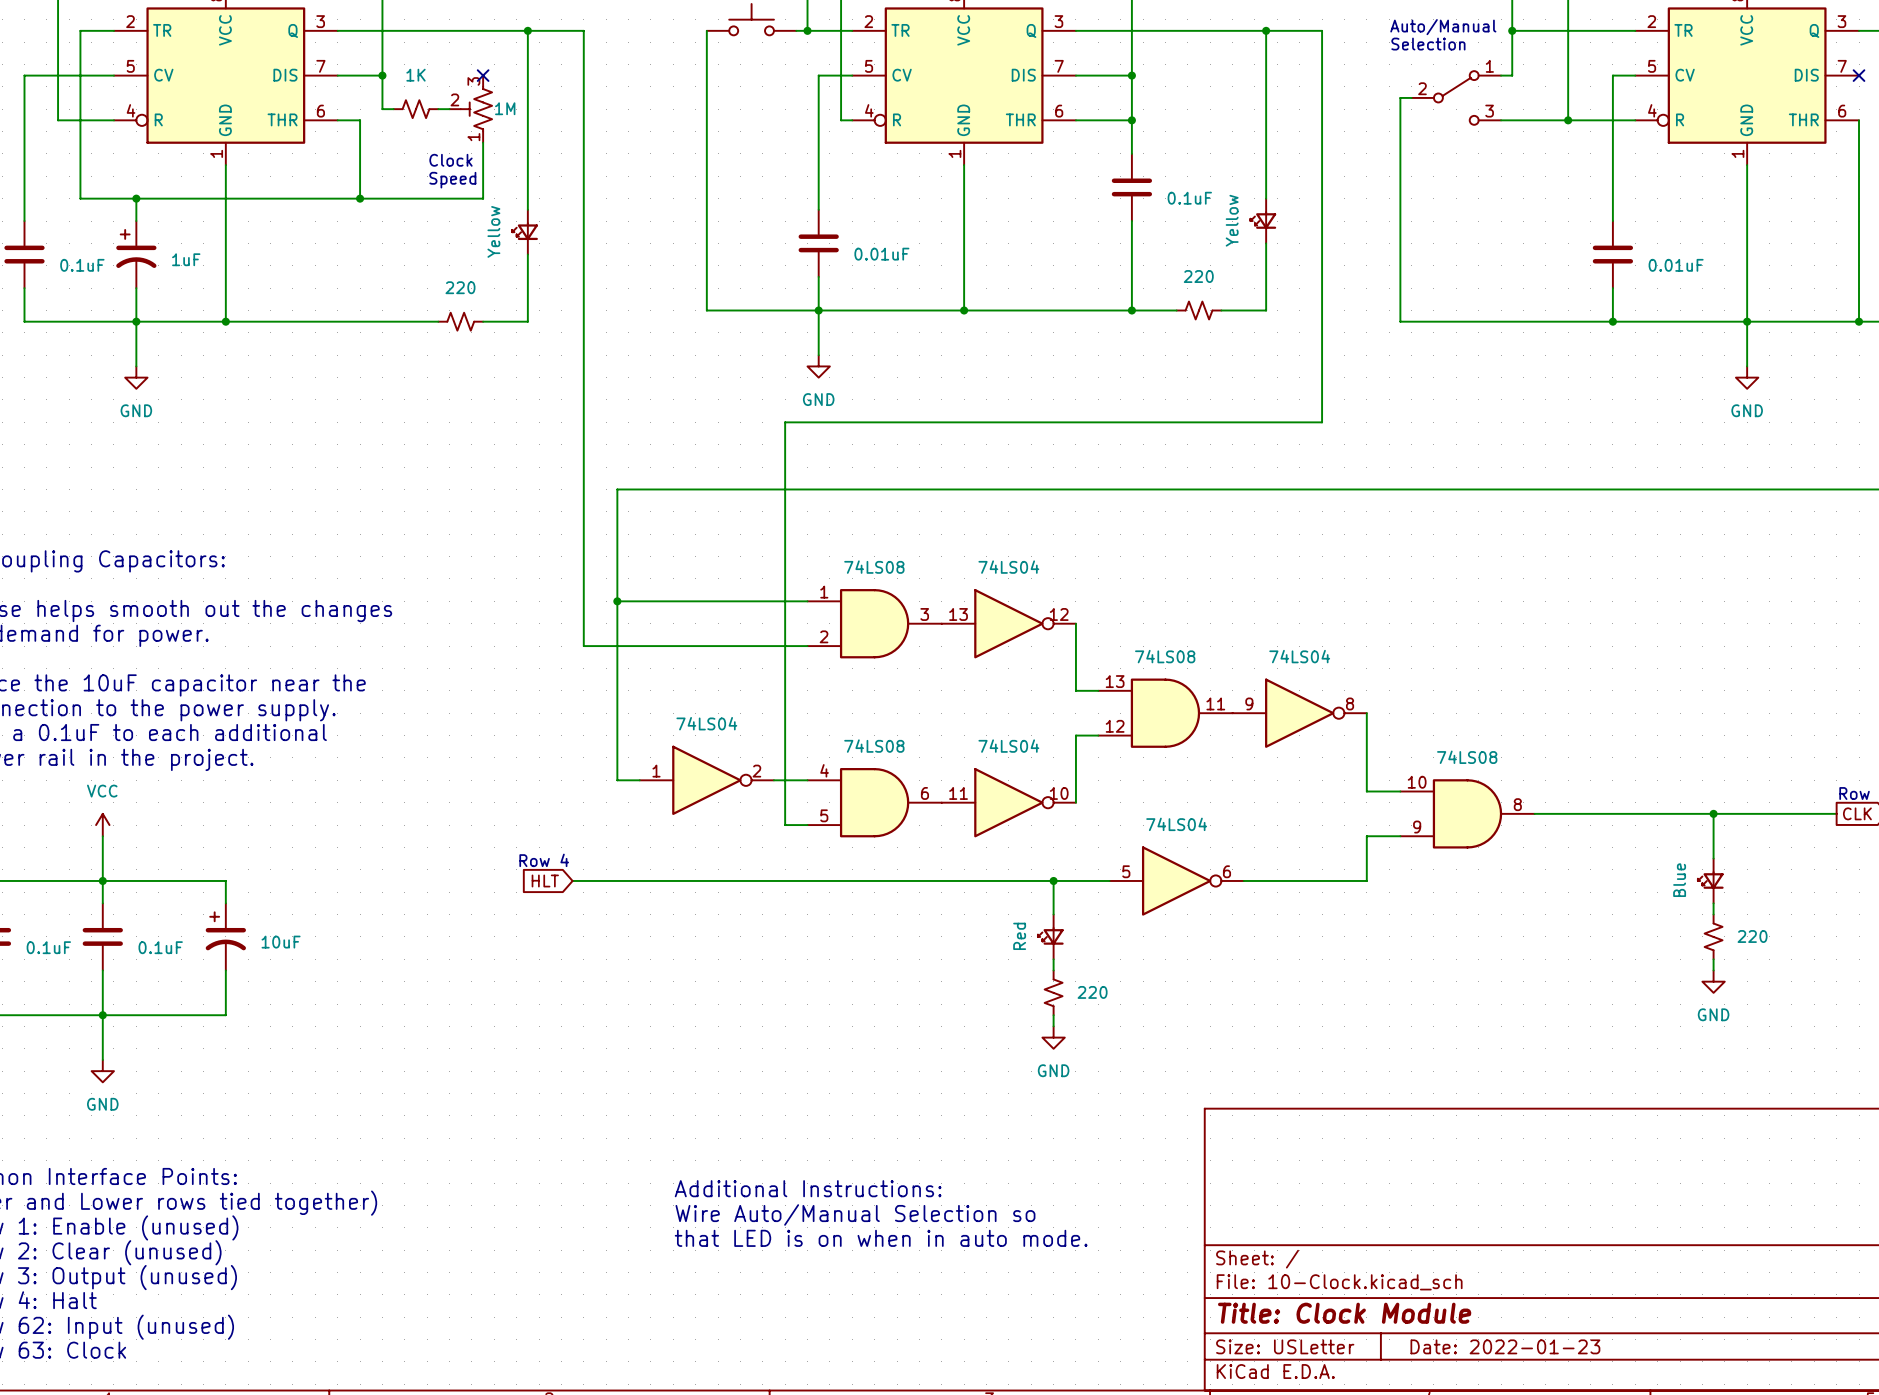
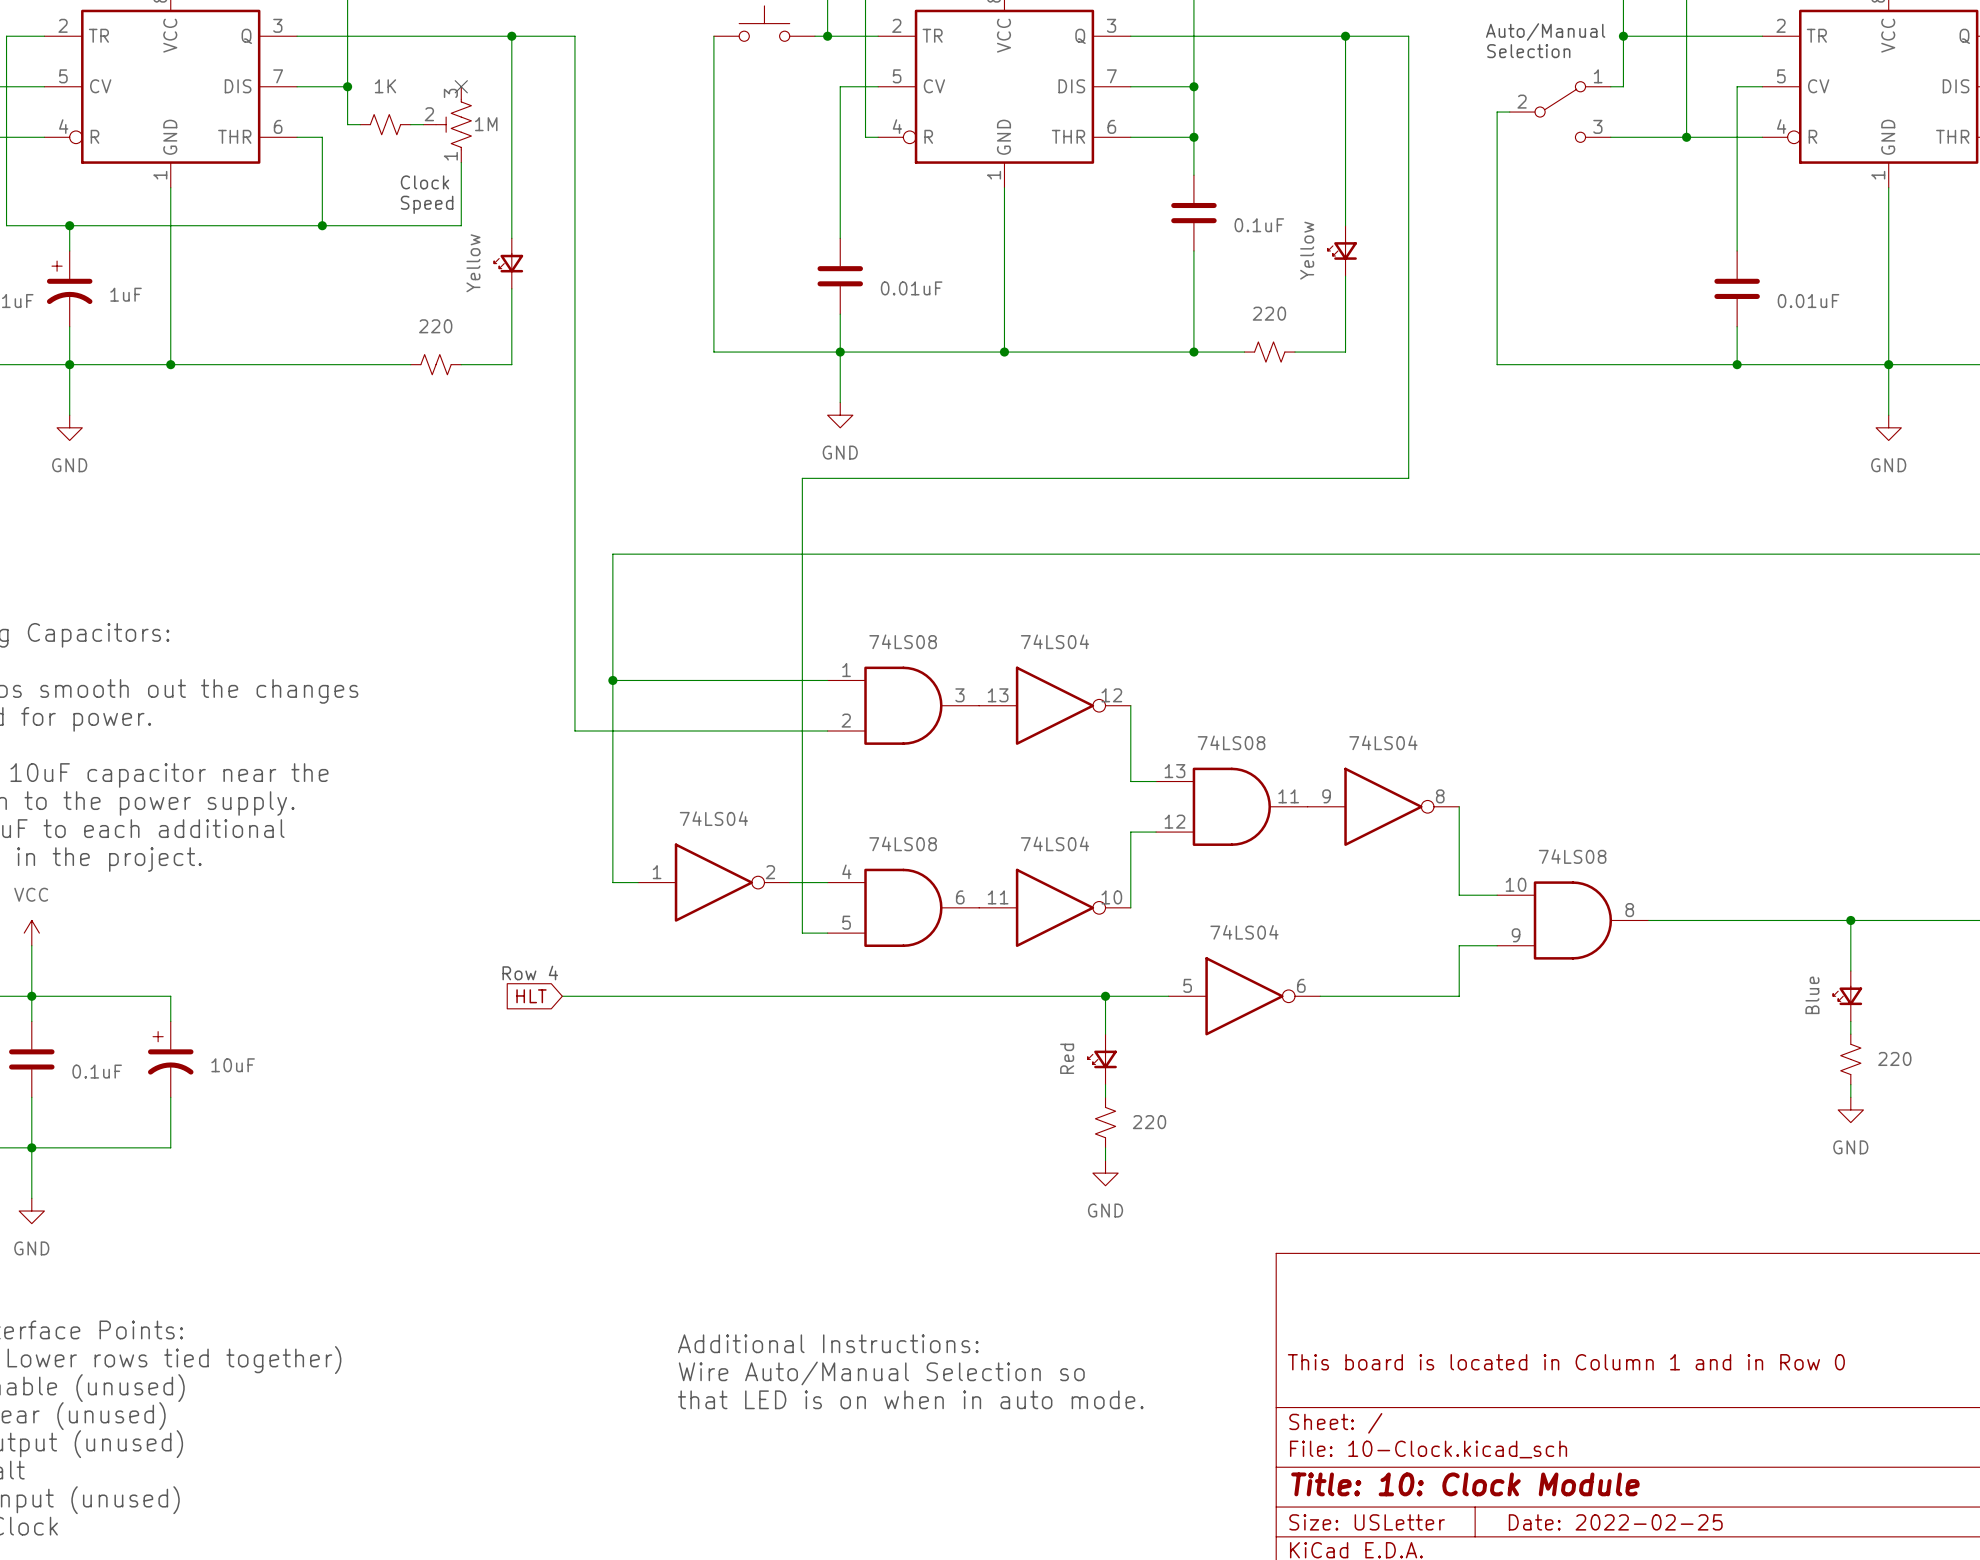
title block: none -> This board is located in Column 1 and in Row 0 (1566, 1362)
title block: Title: Clock Module (1344, 1313) -> Title: 10: Clock Module (1465, 1484)
title block: Date: 2022-01-23 (1505, 1346) -> Date: 2022-02-25 (1615, 1522)

